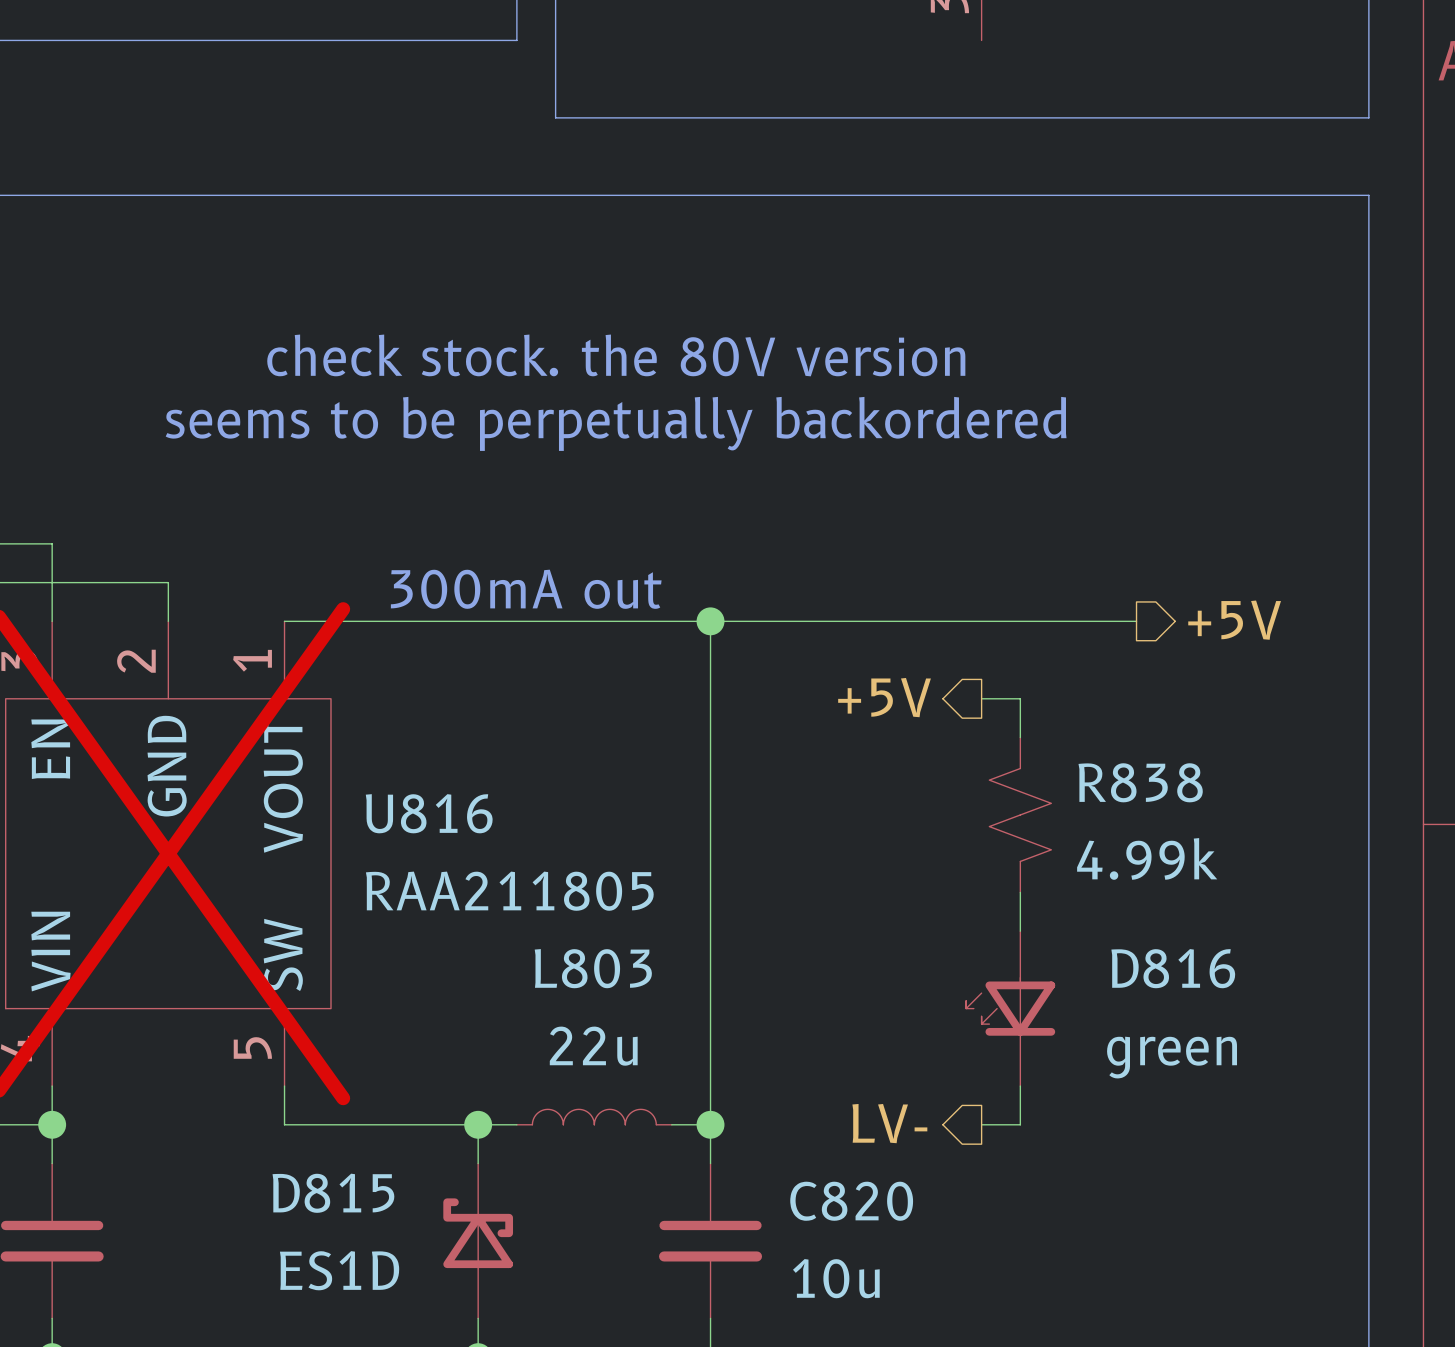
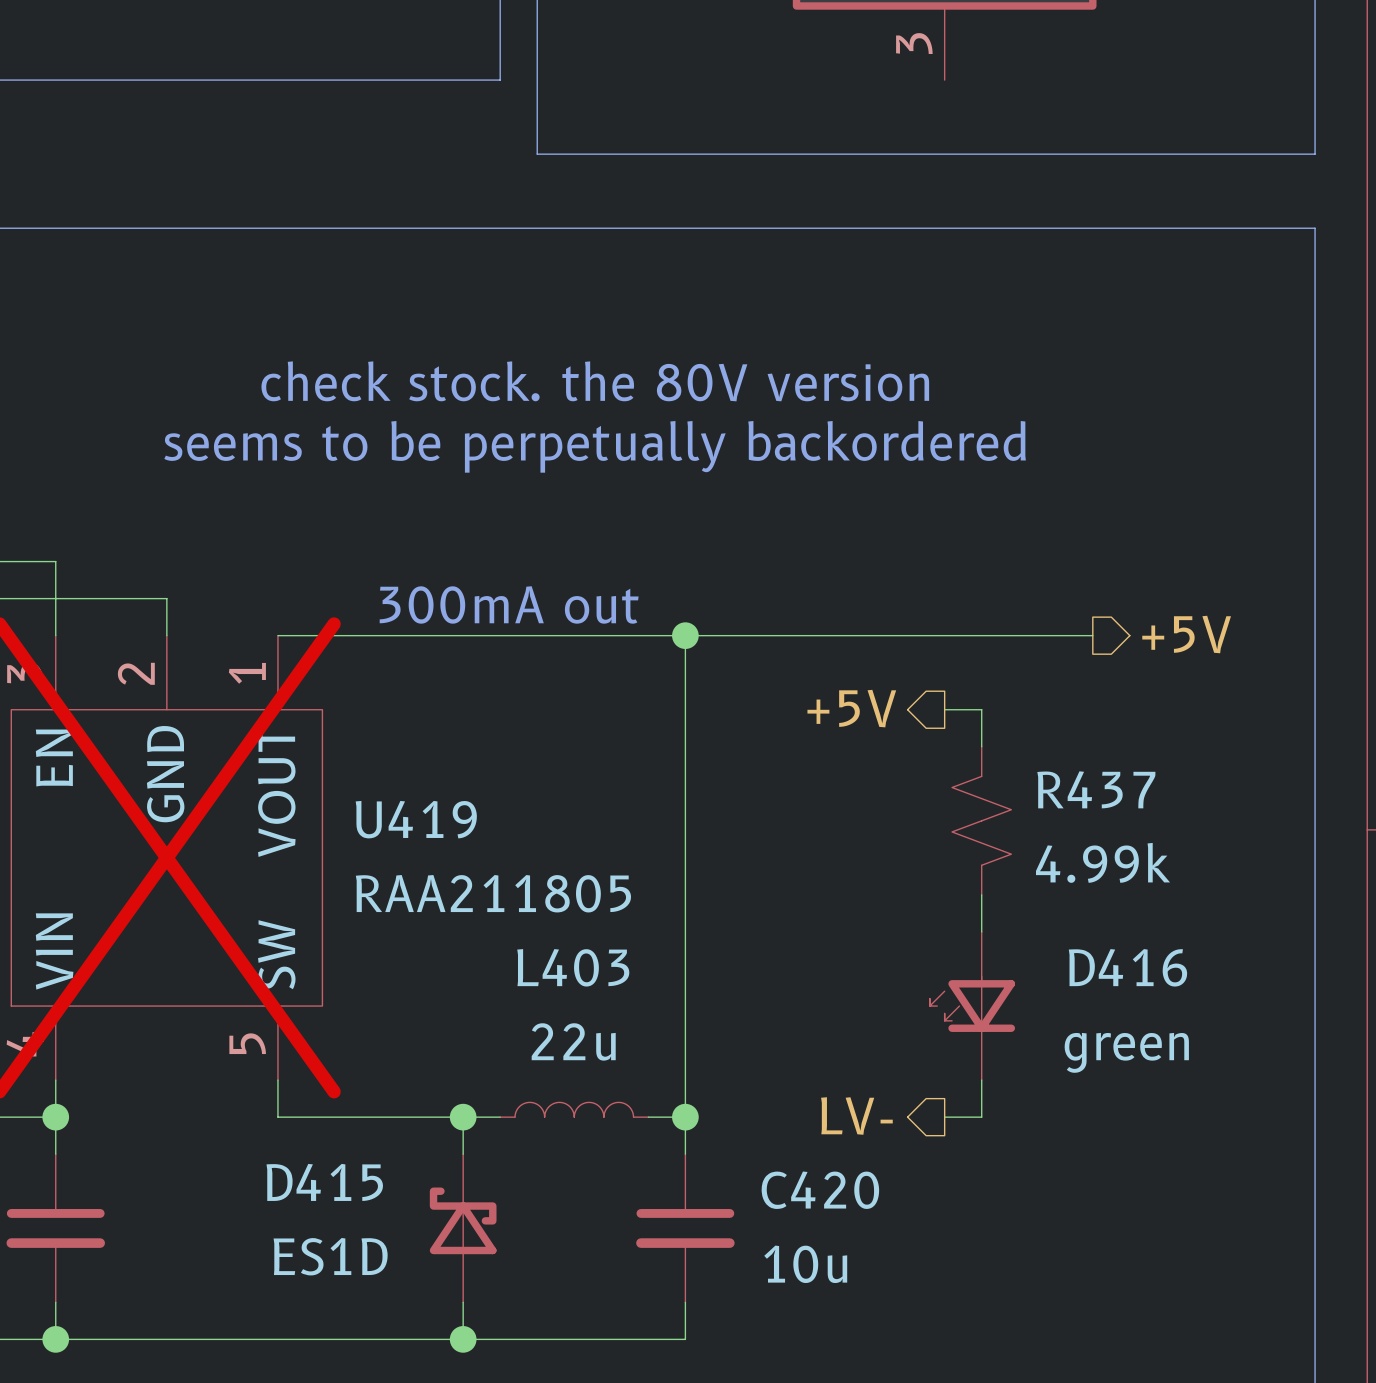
R838 name: R838 (1140, 782) -> R437 (1096, 789)
U816 name: U816 (429, 813) -> U419 (416, 819)
L803 name: L803 (593, 968) -> L403 (573, 967)
D816 name: D816 (1173, 968) -> D416 (1127, 967)
D815 name: D815 (333, 1193) -> D415 (324, 1182)
C820 name: C820 (851, 1201) -> C420 (820, 1190)

